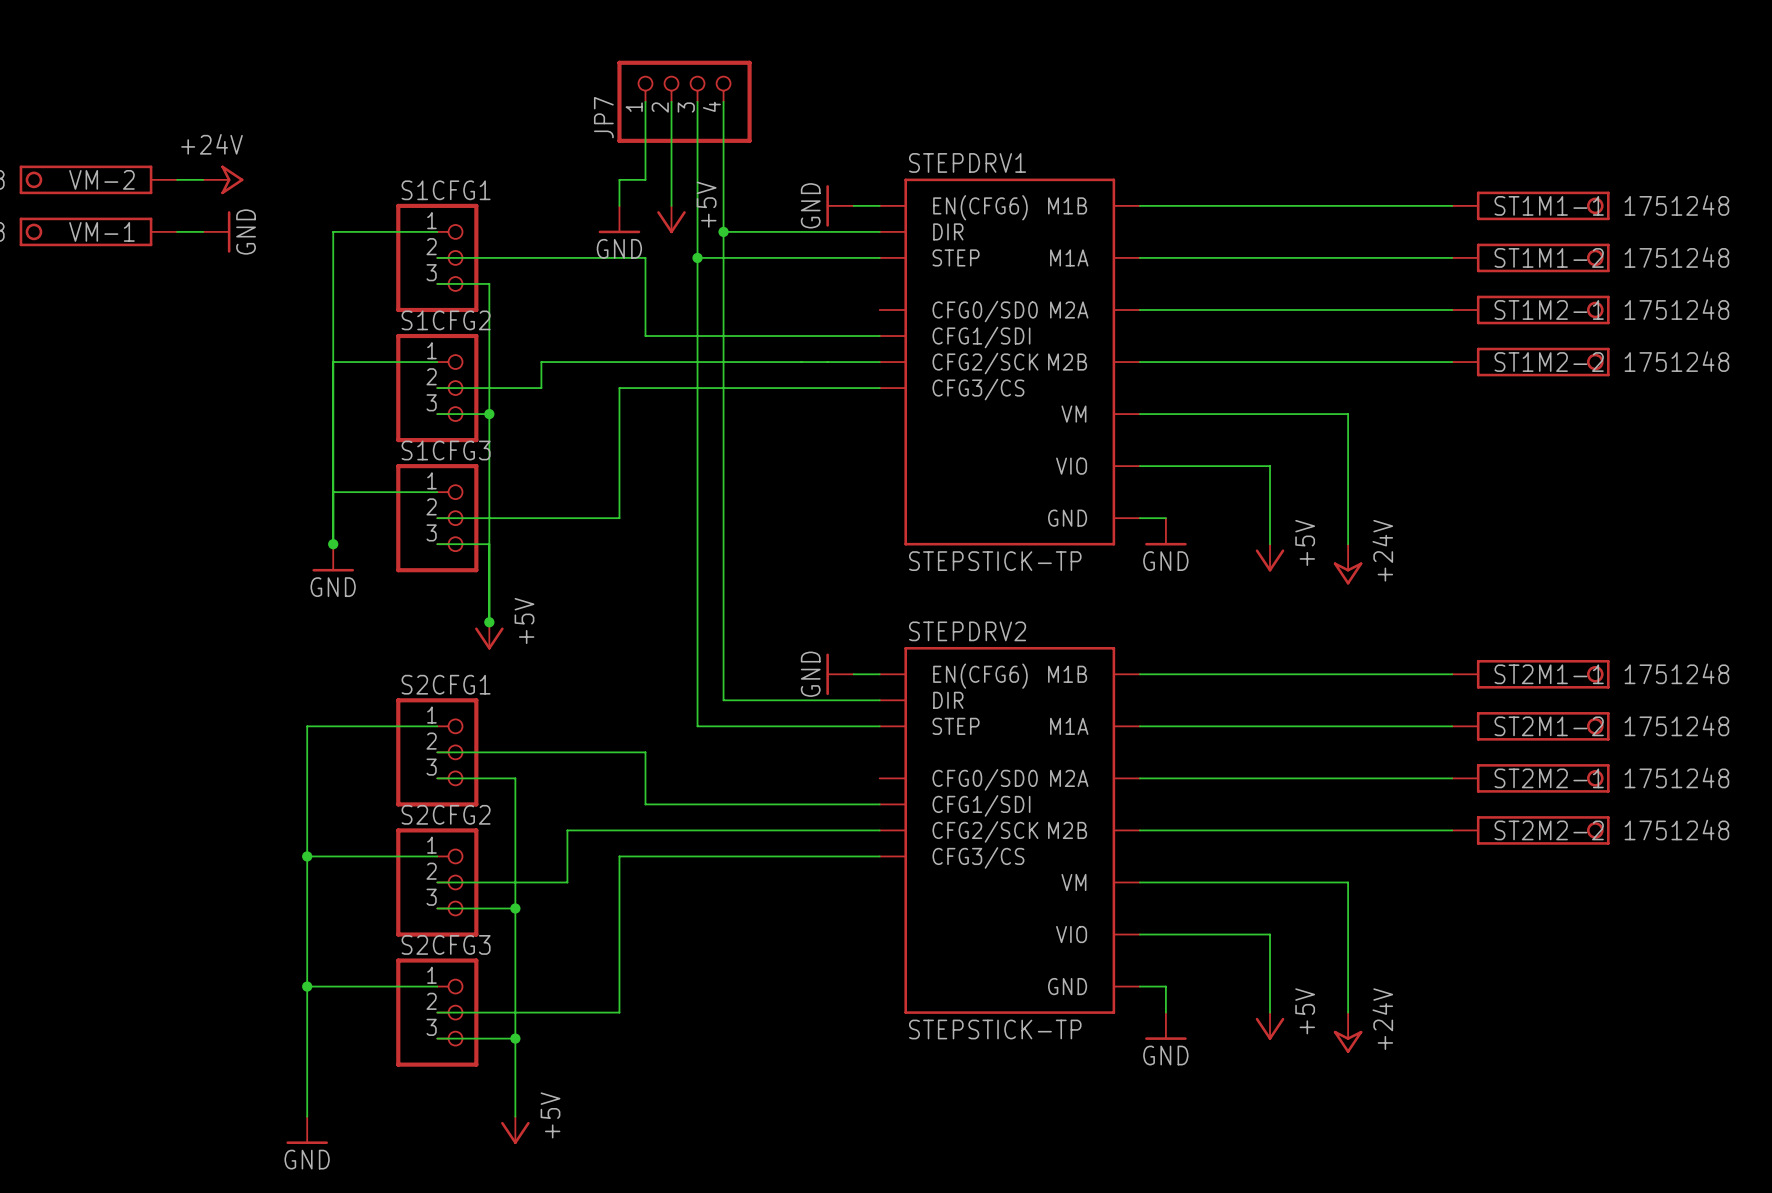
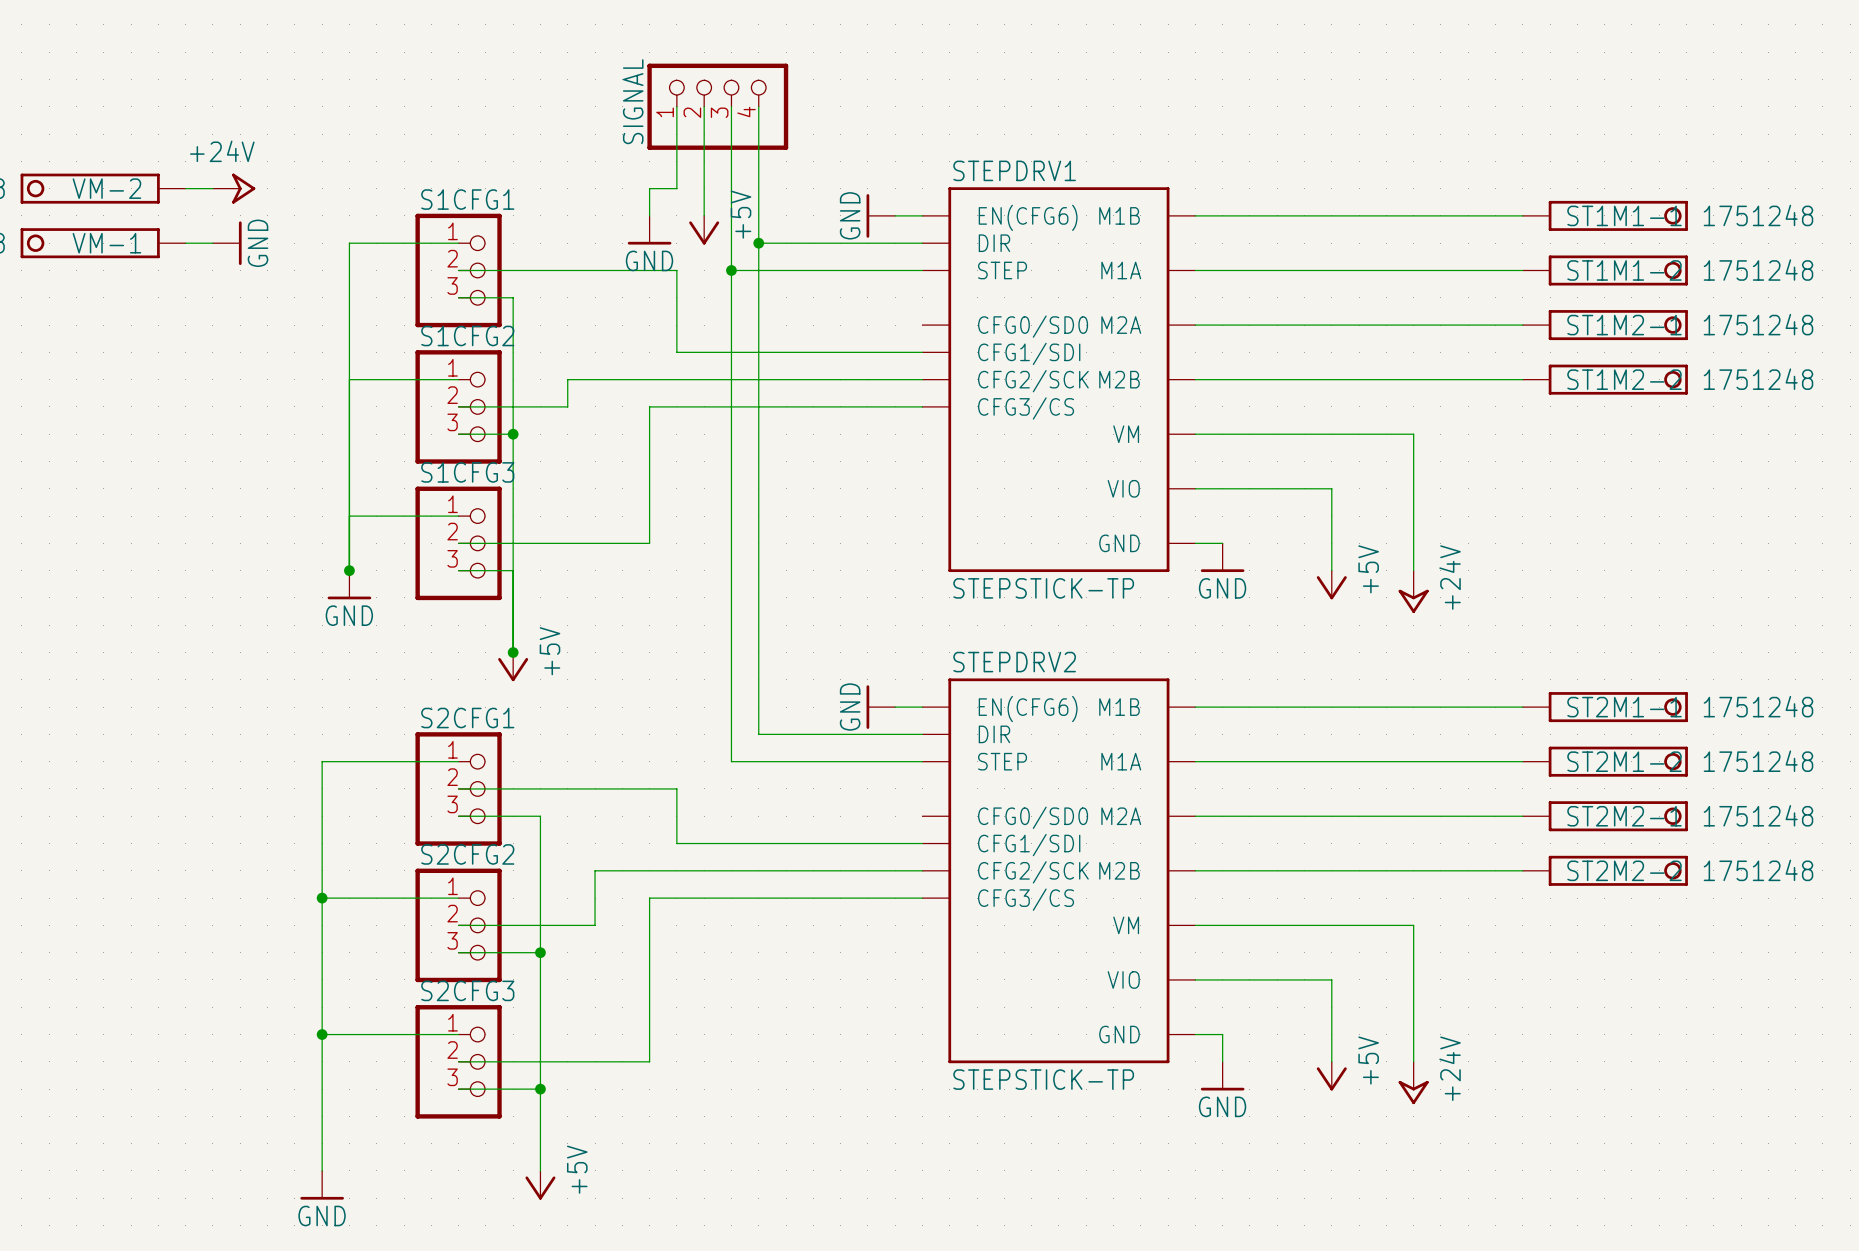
JP7 name: JP7 (603, 117) -> SIGNAL (633, 101)

